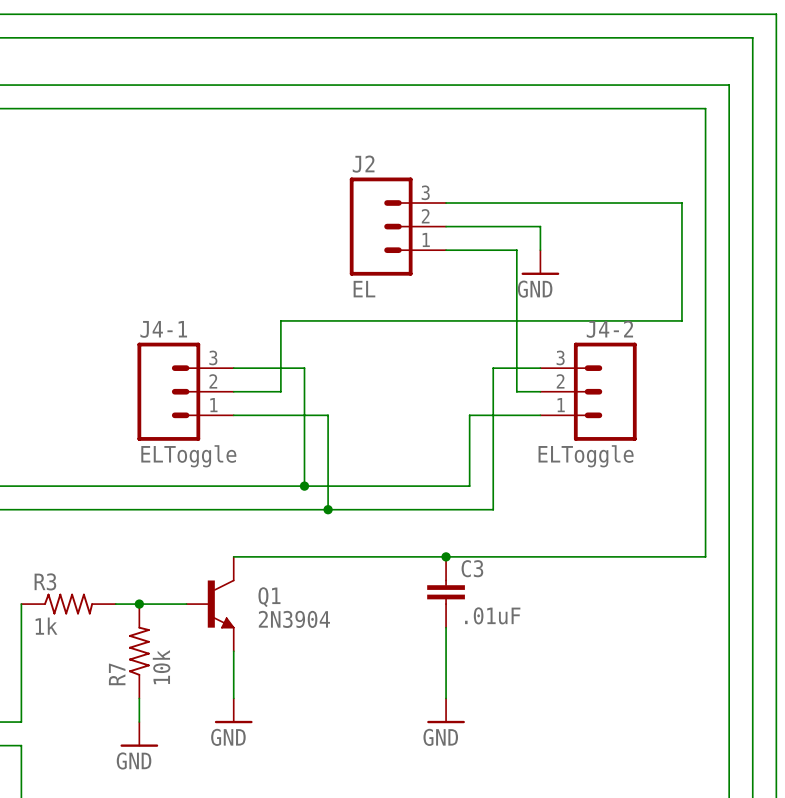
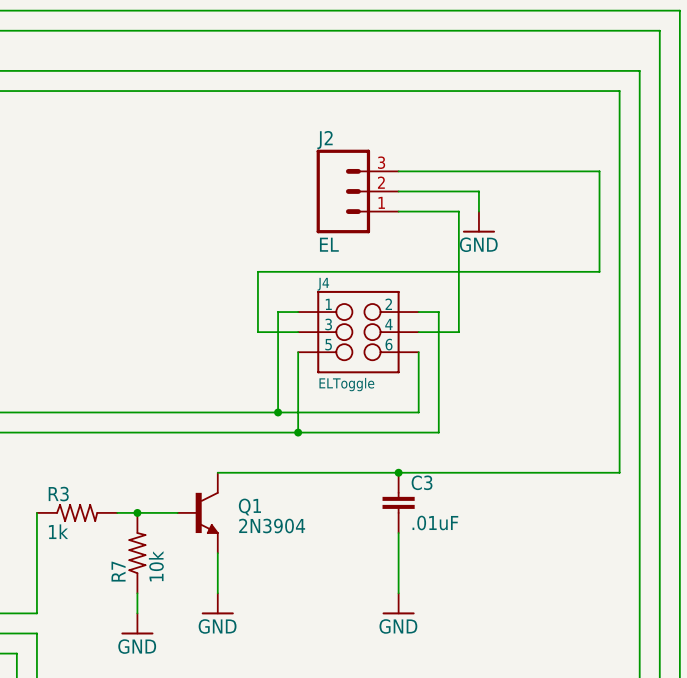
wire: (233, 368) (304, 368) -> (298, 312) (278, 312)
wire: (493, 368) (540, 368) -> (438, 312) (418, 312)
J4-1: ELToggle (185, 391) -> none
wire: (233, 391) (280, 391) -> (298, 332) (257, 332)
J4: none -> ELToggle (358, 332)
wire: (516, 391) (540, 391) -> (458, 332) (418, 332)
J4-2: ELToggle (588, 391) -> none
wire: (233, 415) (328, 415) -> none
wire: (469, 415) (540, 415) -> none

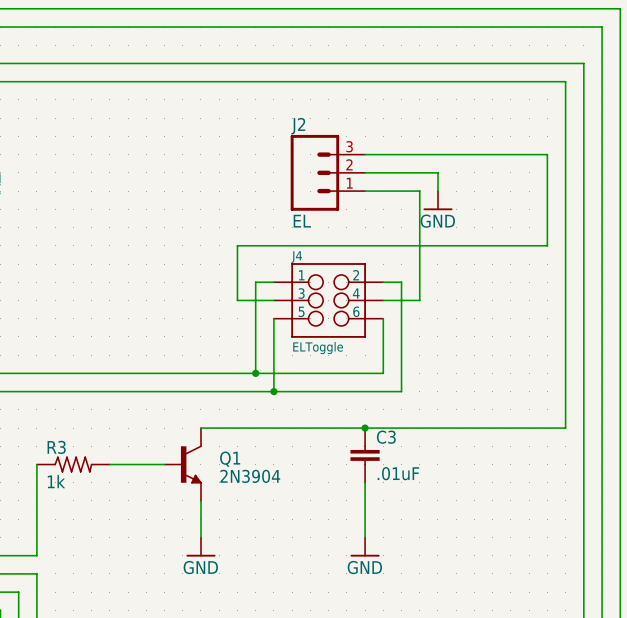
junction: (137, 512) -> none
R7: 10k (137, 553) -> none
wire: (137, 593) (137, 613) -> none
power symbol: GND (137, 623) -> none

